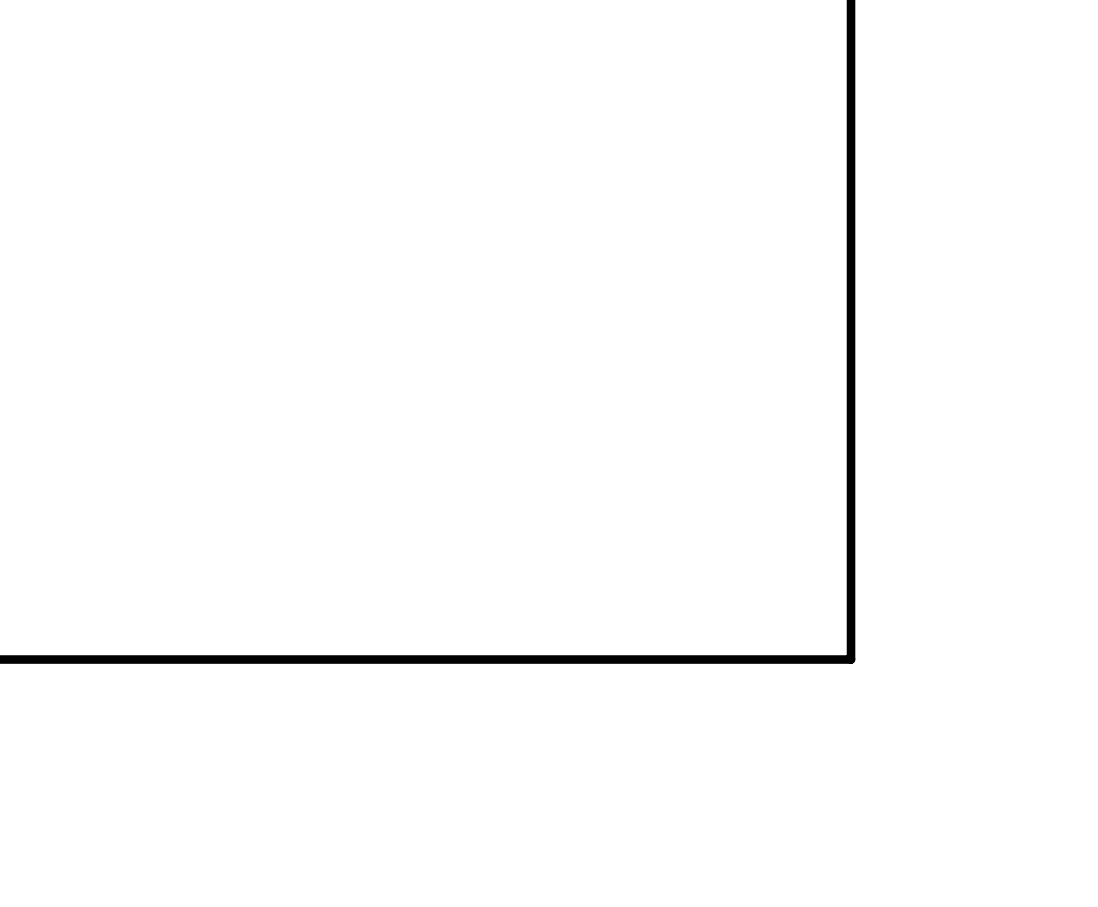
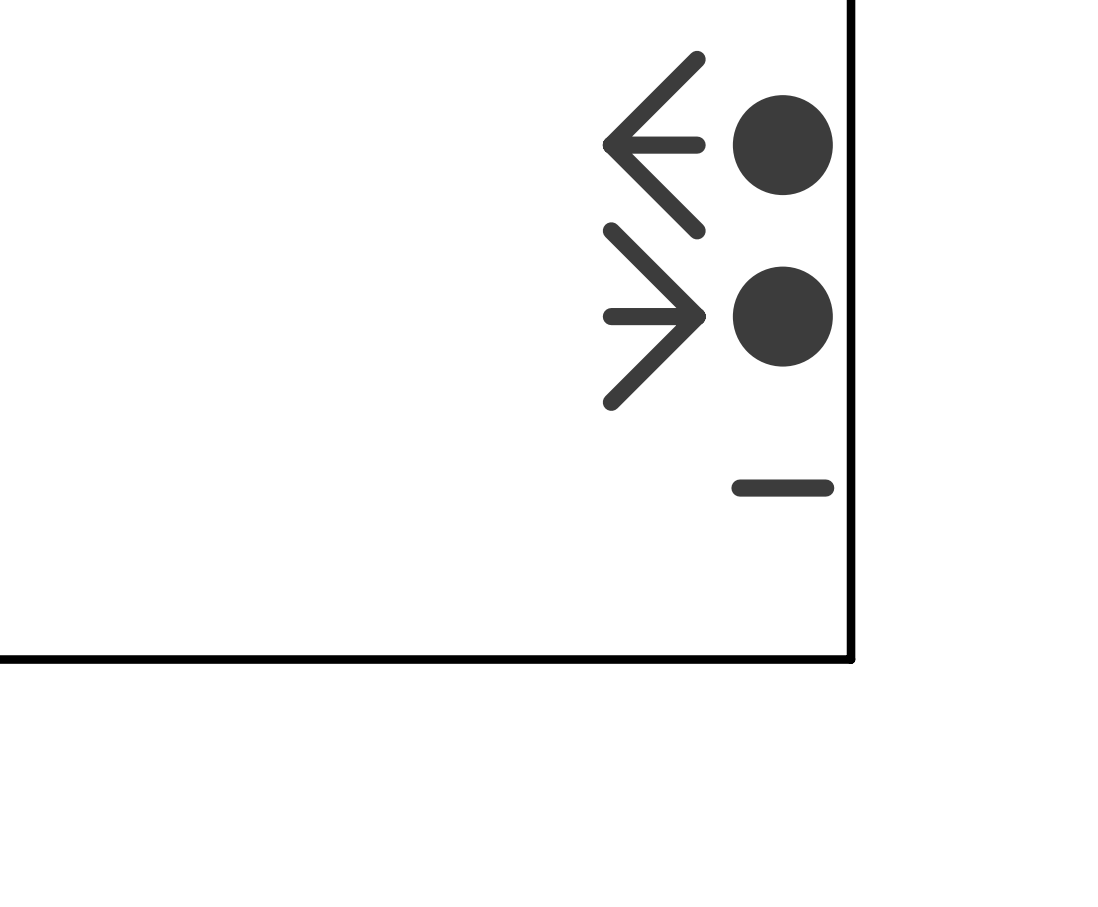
line: none -> (697, 59) (611, 145)
drawing: none -> [732, 95, 833, 367]
line: none -> (611, 145) (697, 230)
line: none -> (611, 145) (697, 145)
line: none -> (611, 230) (697, 316)
line: none -> (611, 316) (697, 316)
line: none -> (697, 316) (611, 402)
line: none -> (739, 488) (825, 488)

